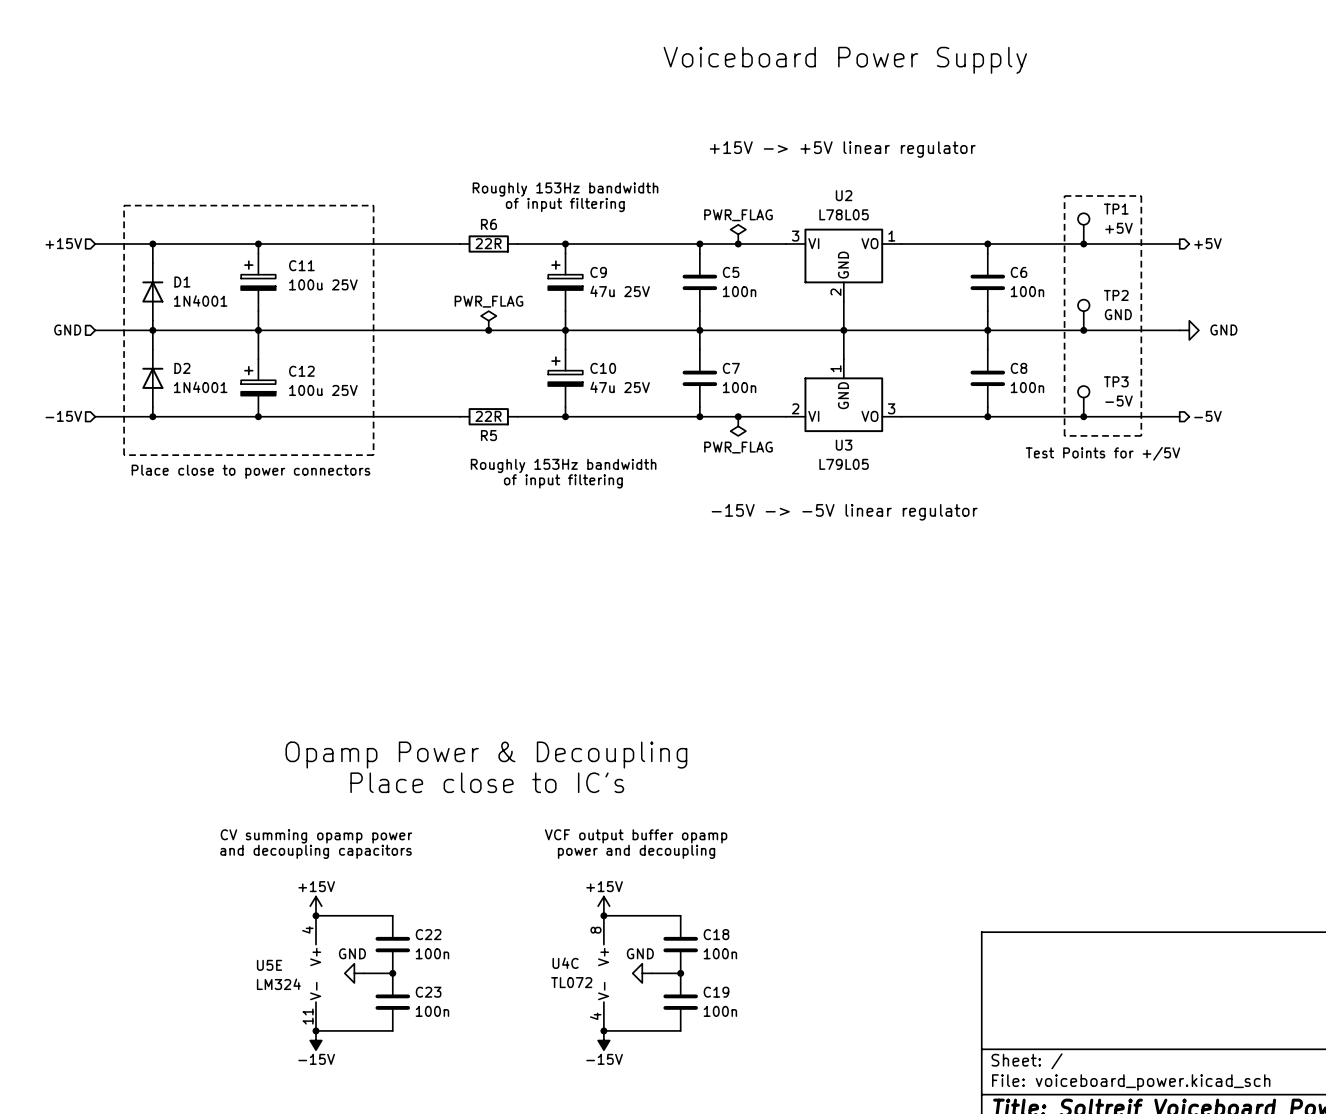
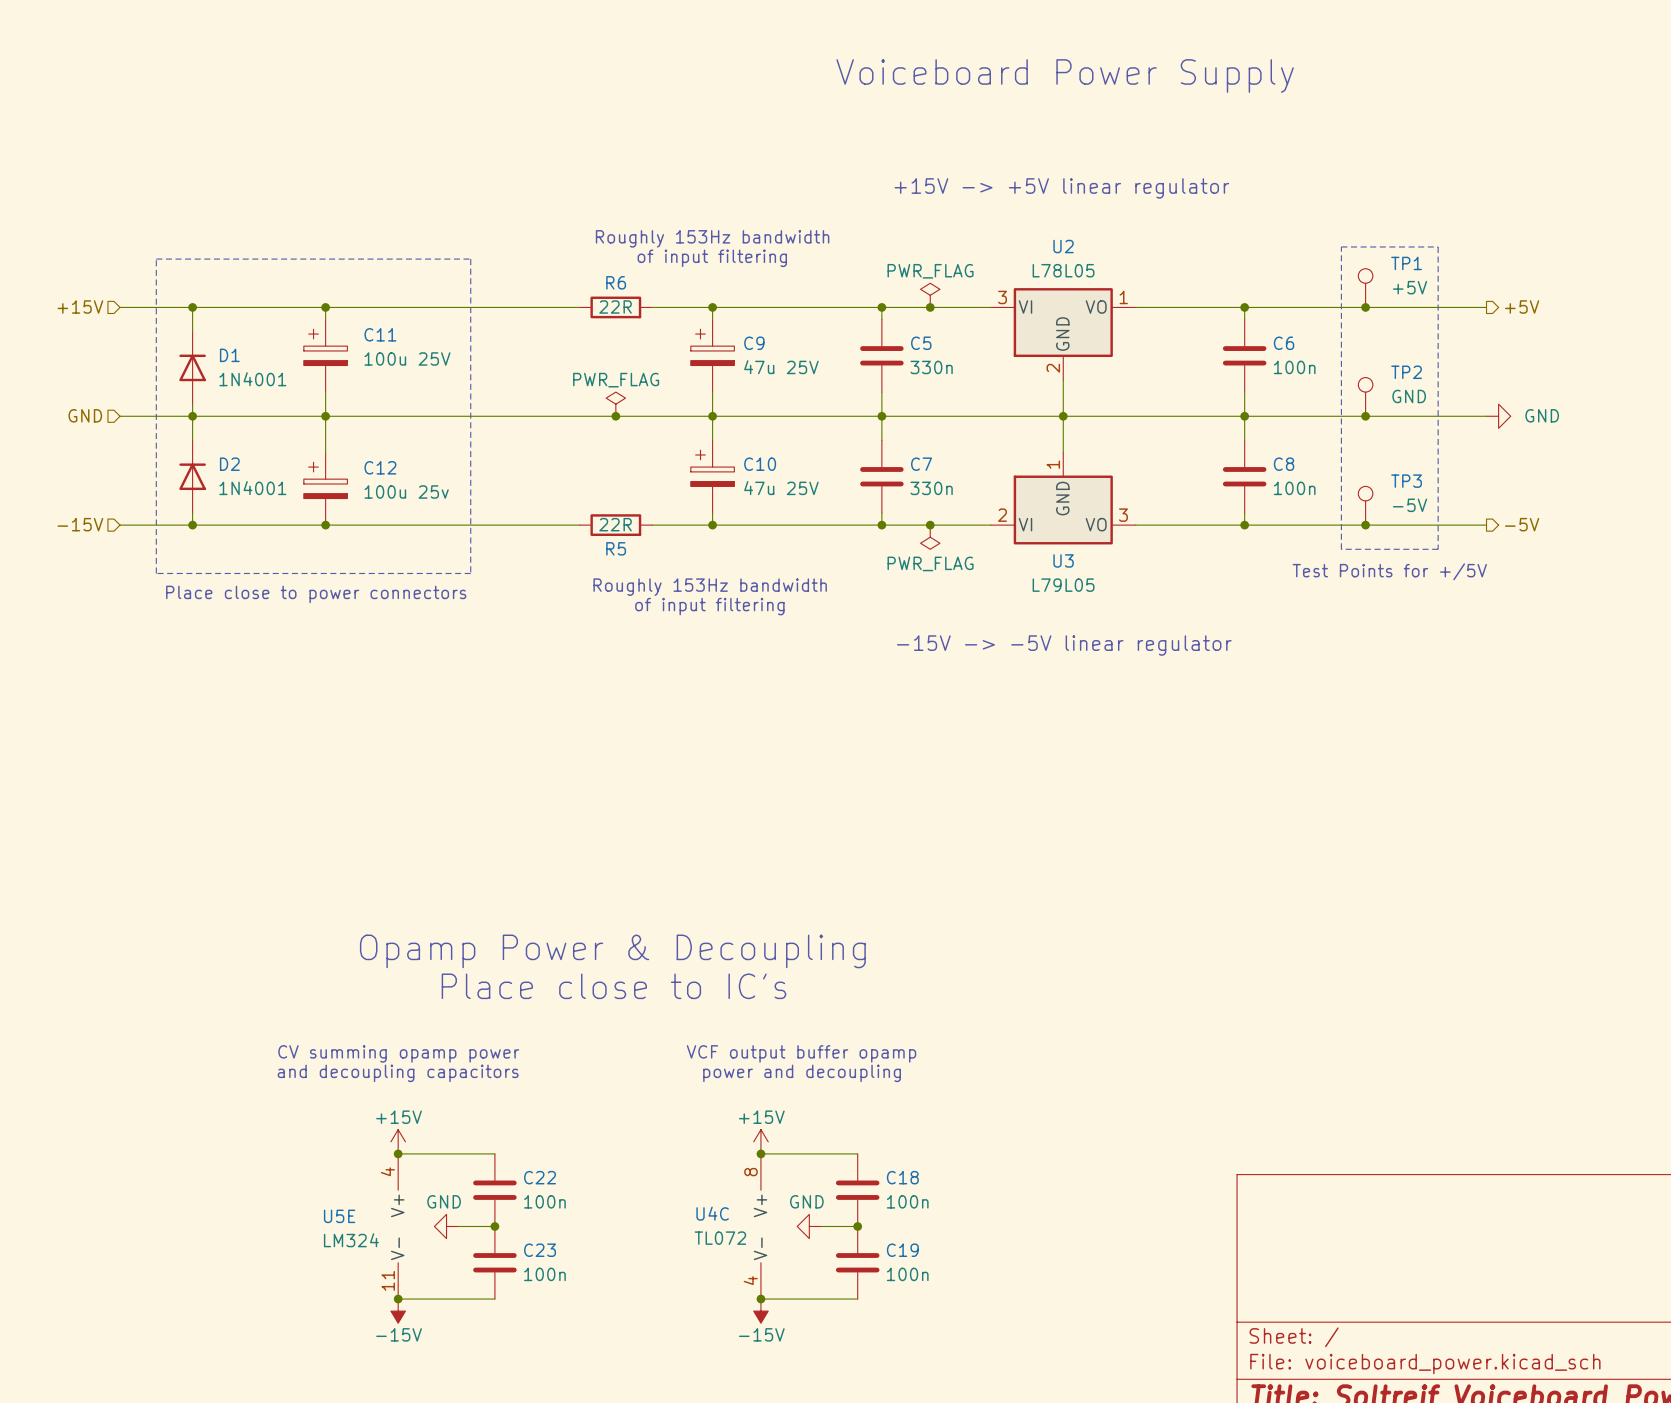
C5 value: 100n (739, 291) -> 330n (931, 367)
C7 value: 100n (739, 387) -> 330n (931, 488)
C12 value: 100u 25V (323, 390) -> 100u 25v (406, 492)

